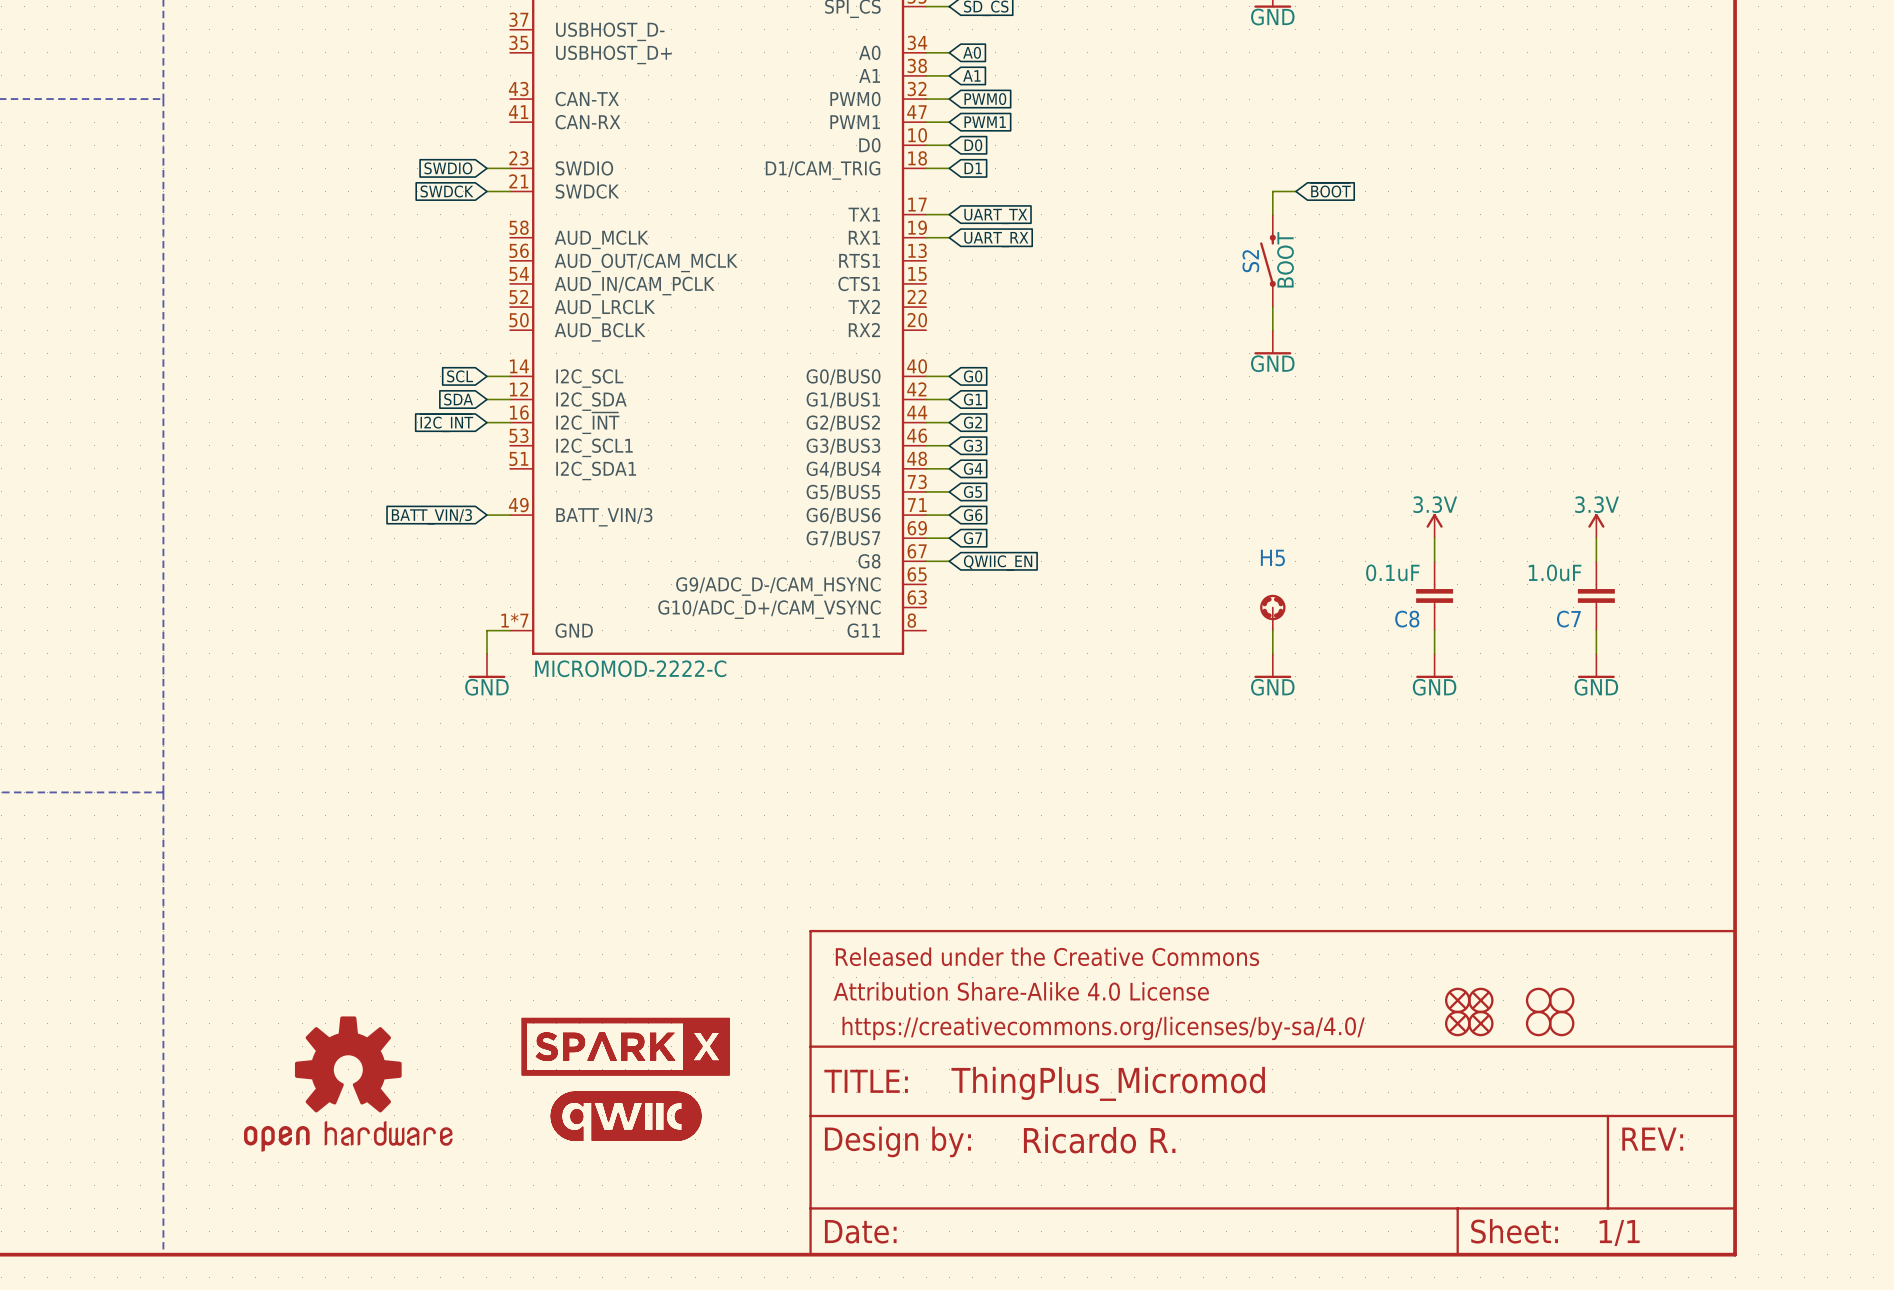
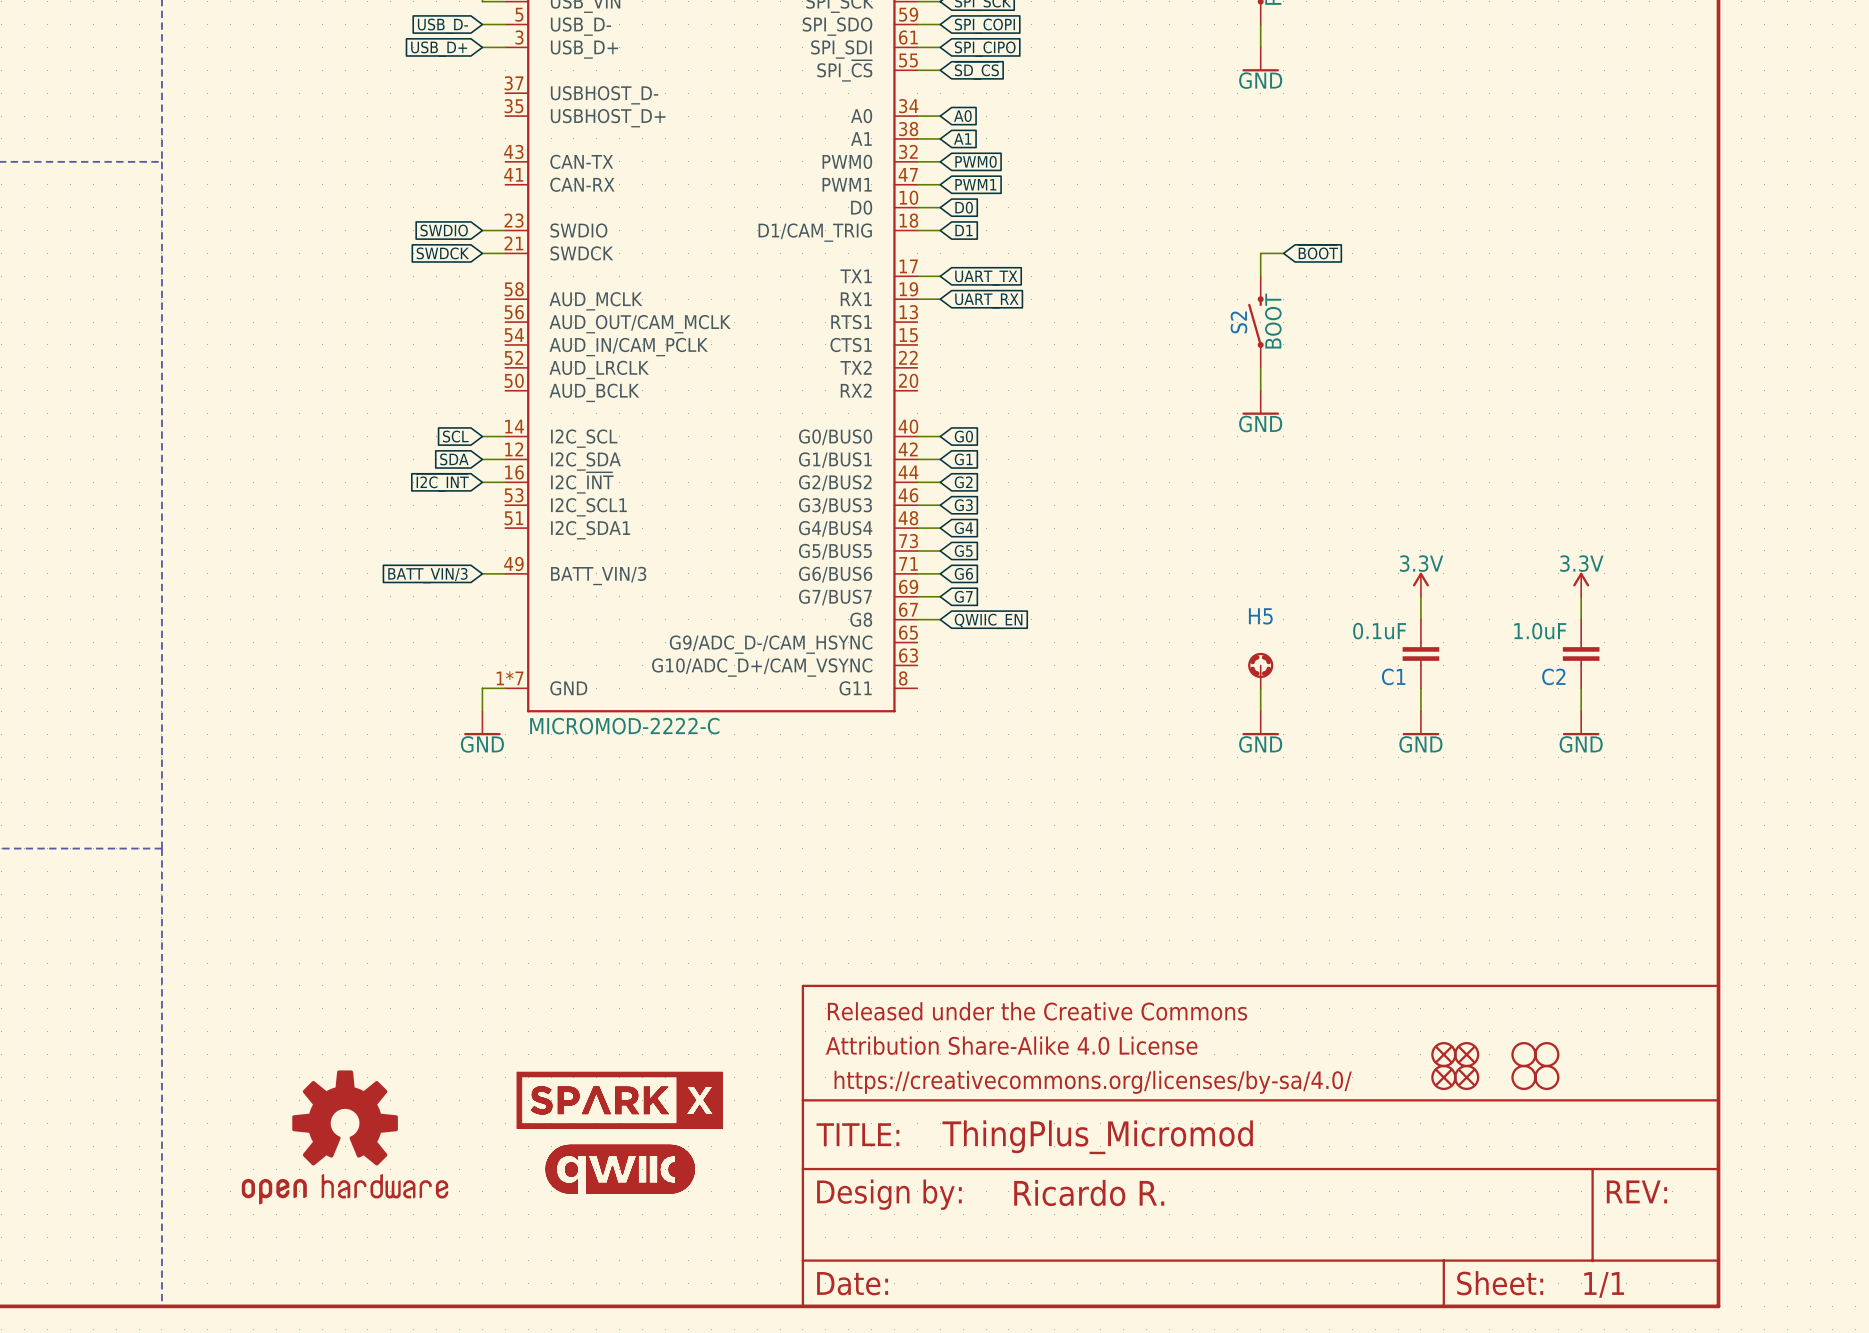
C8 name: C8 (1407, 619) -> C1 (1393, 676)
C7 name: C7 (1568, 619) -> C2 (1553, 676)

